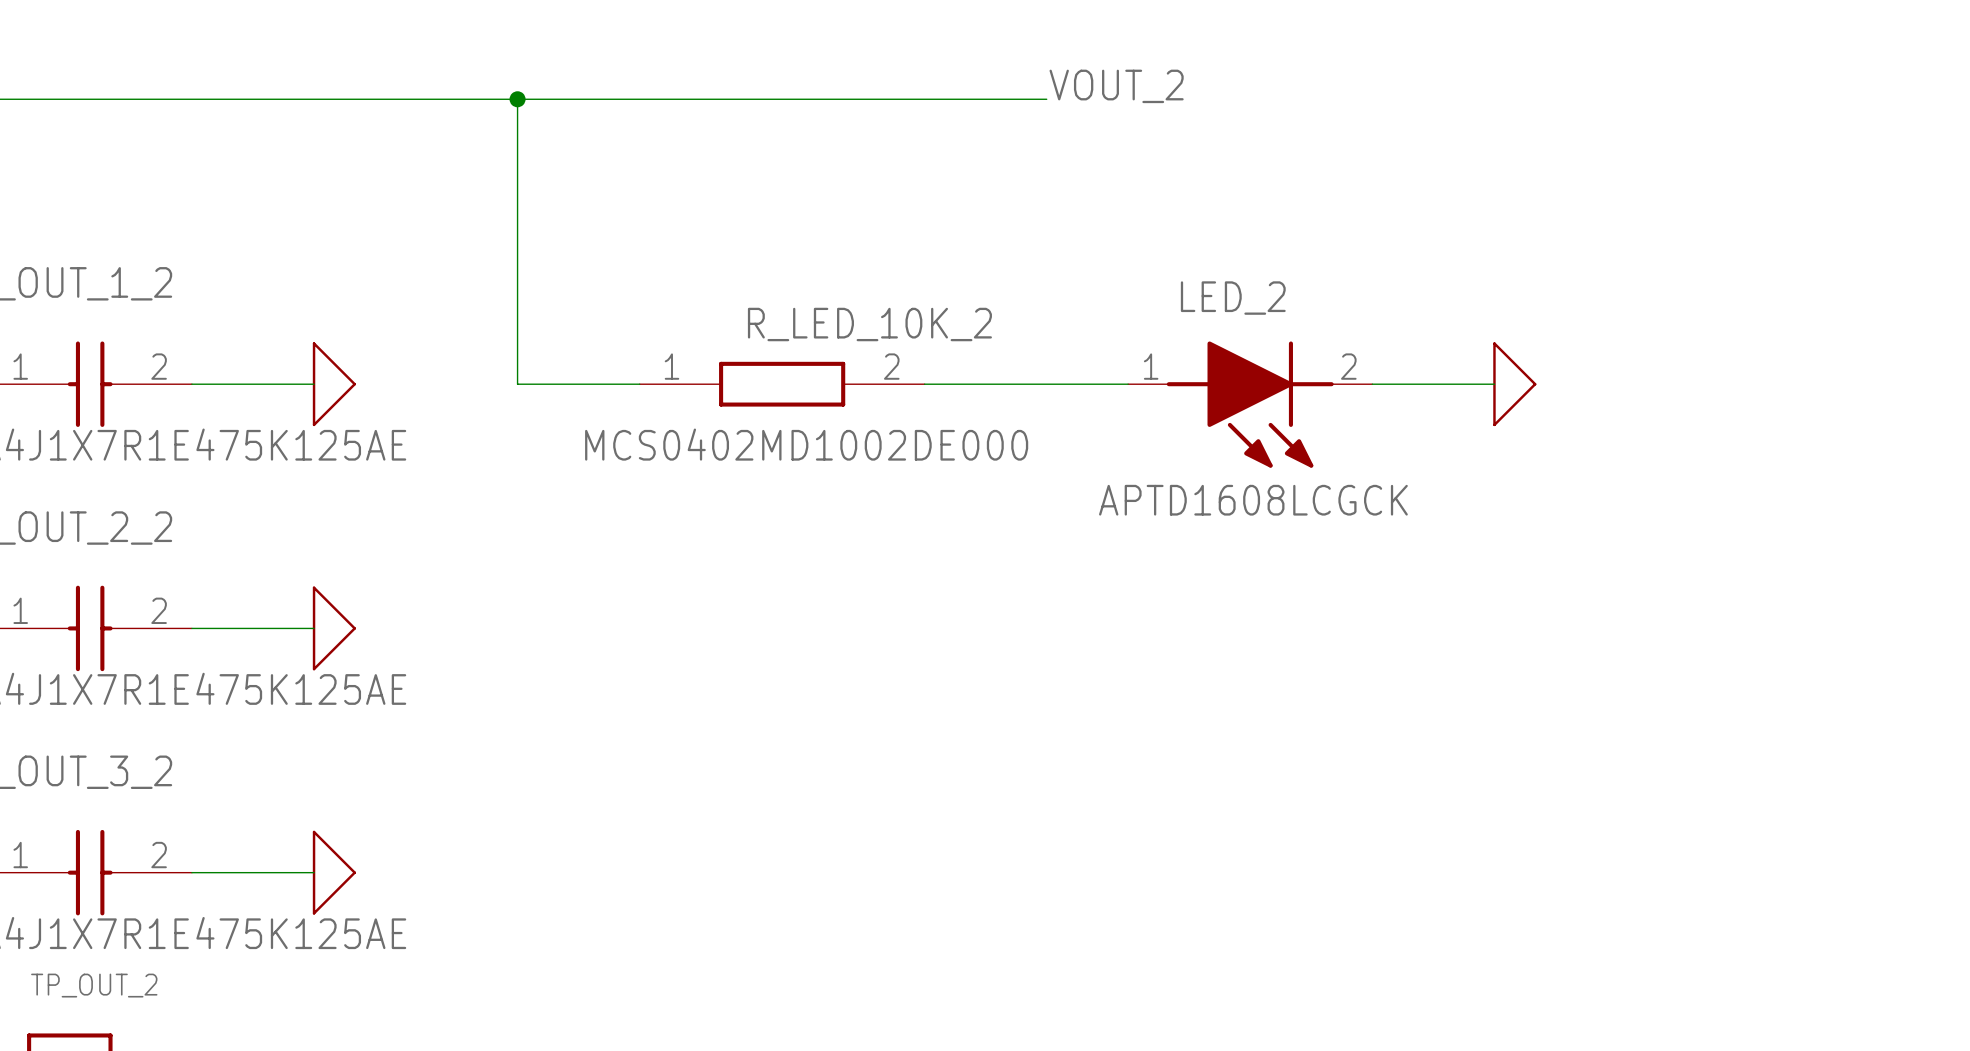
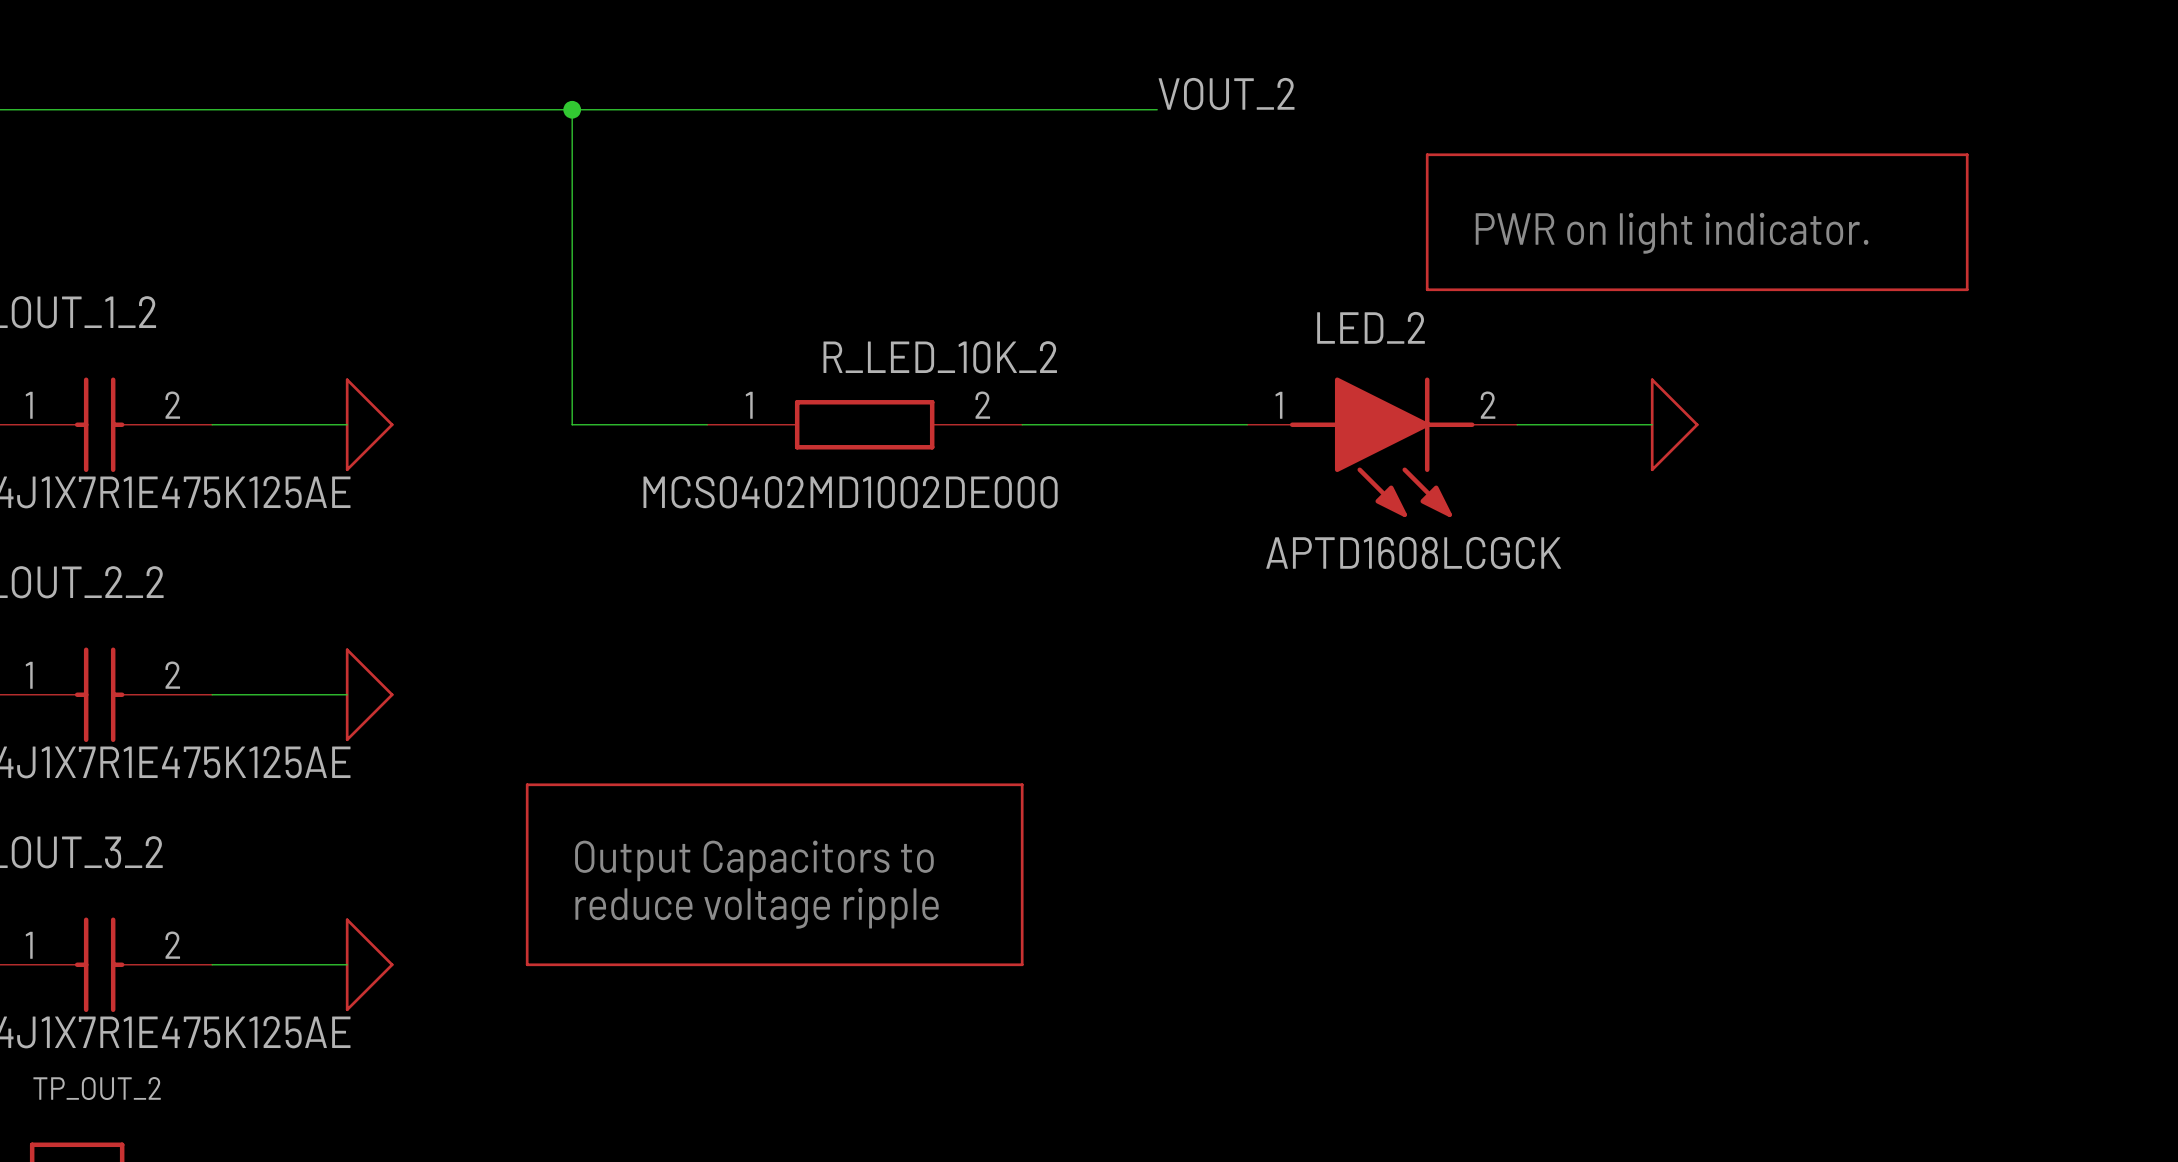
line: none -> (1427, 154) (1427, 289) (1967, 289) (1967, 154) (1427, 154)
text: none -> PWR on light indicator. (1672, 233)
line: none -> (527, 784) (527, 964) (1022, 964) (1022, 784) (527, 784)
text: none -> Output Capacitors to (754, 860)
text: none -> reduce voltage ripple (757, 908)

